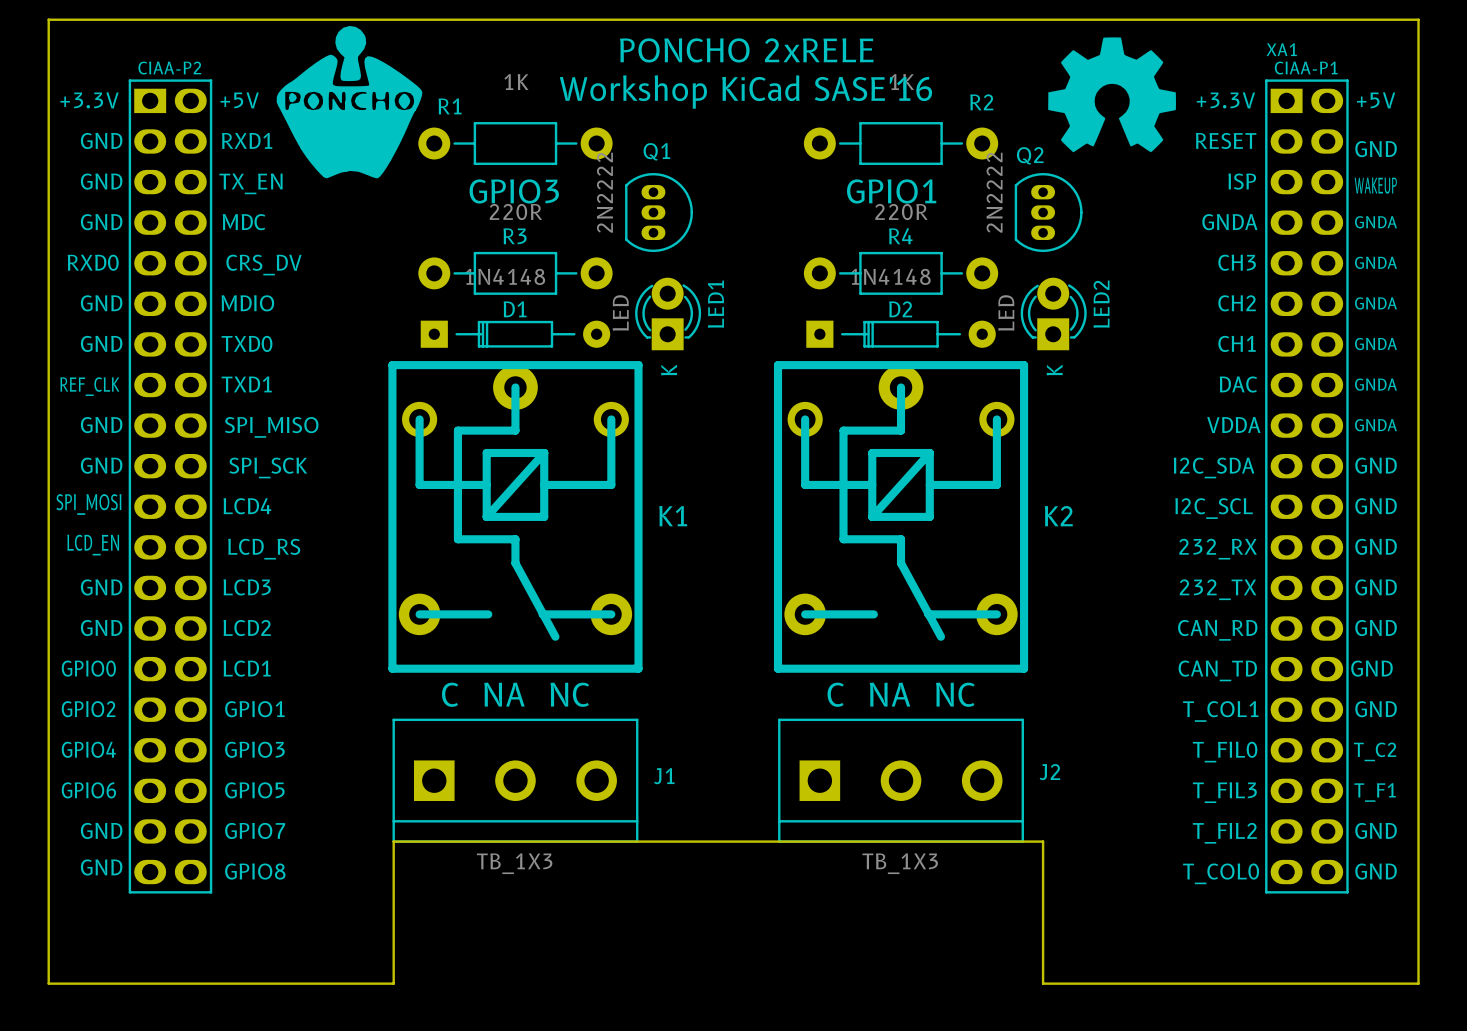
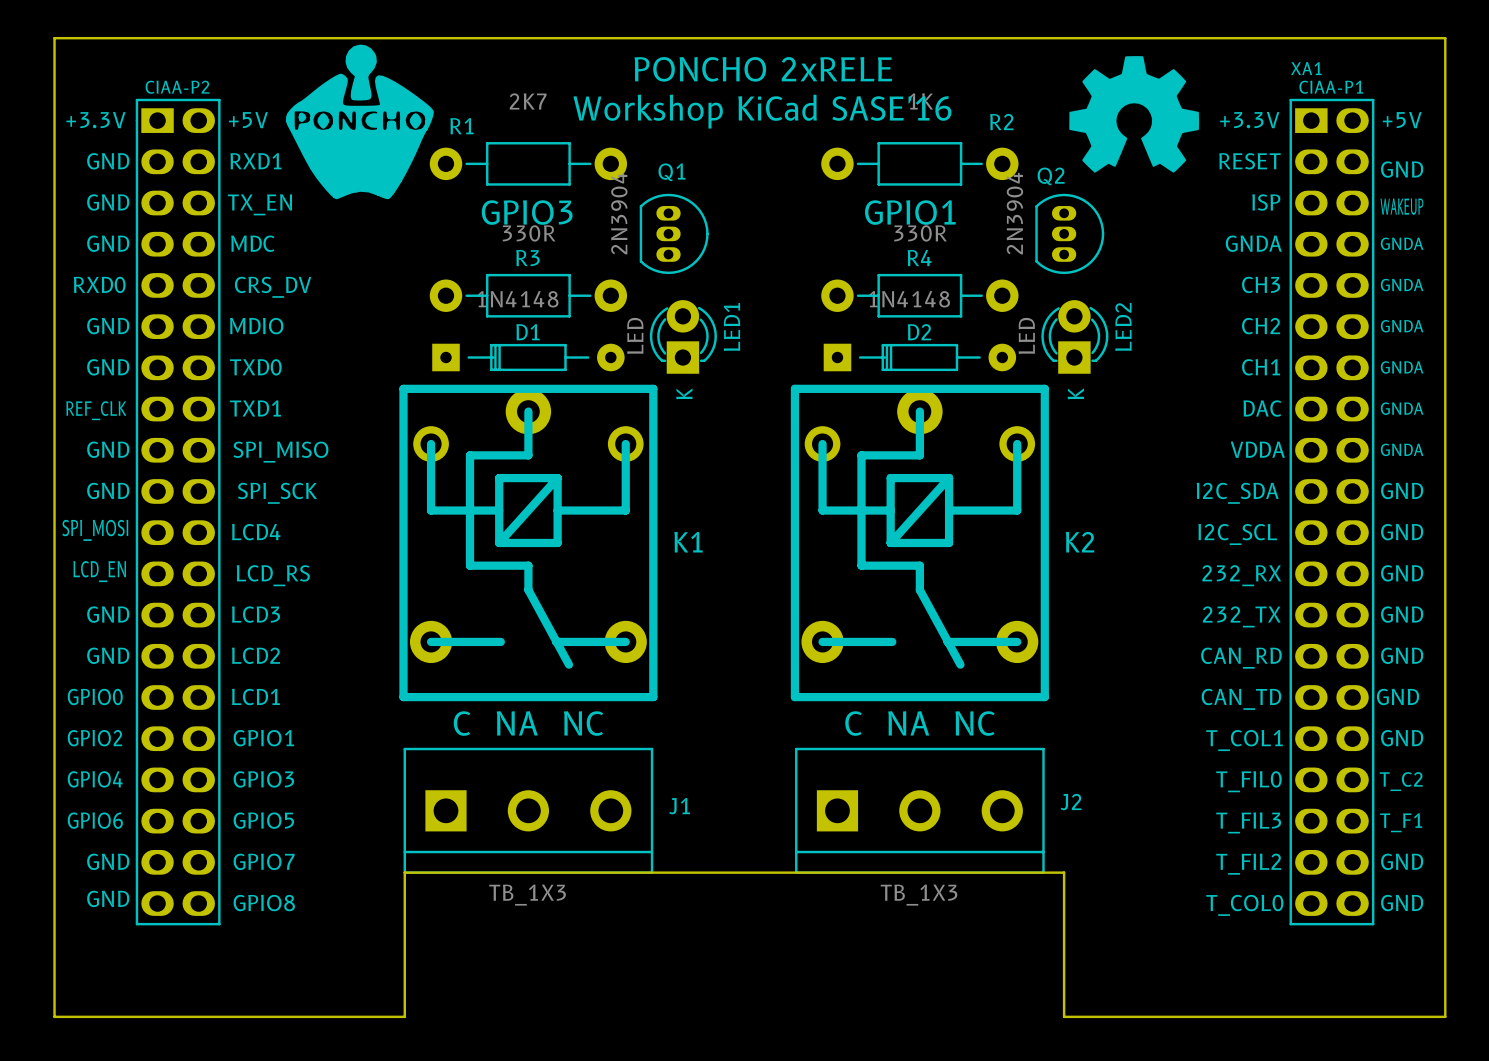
R1 value: 1K (516, 82) -> 2K7 (528, 101)
Q1 value: 2N2222 (604, 192) -> 2N3904 (619, 213)
Q2 value: 2N2222 (994, 192) -> 2N3904 (1014, 213)
R3 value: 220R (515, 212) -> 330R (529, 233)
R4 value: 220R (901, 212) -> 330R (920, 233)

